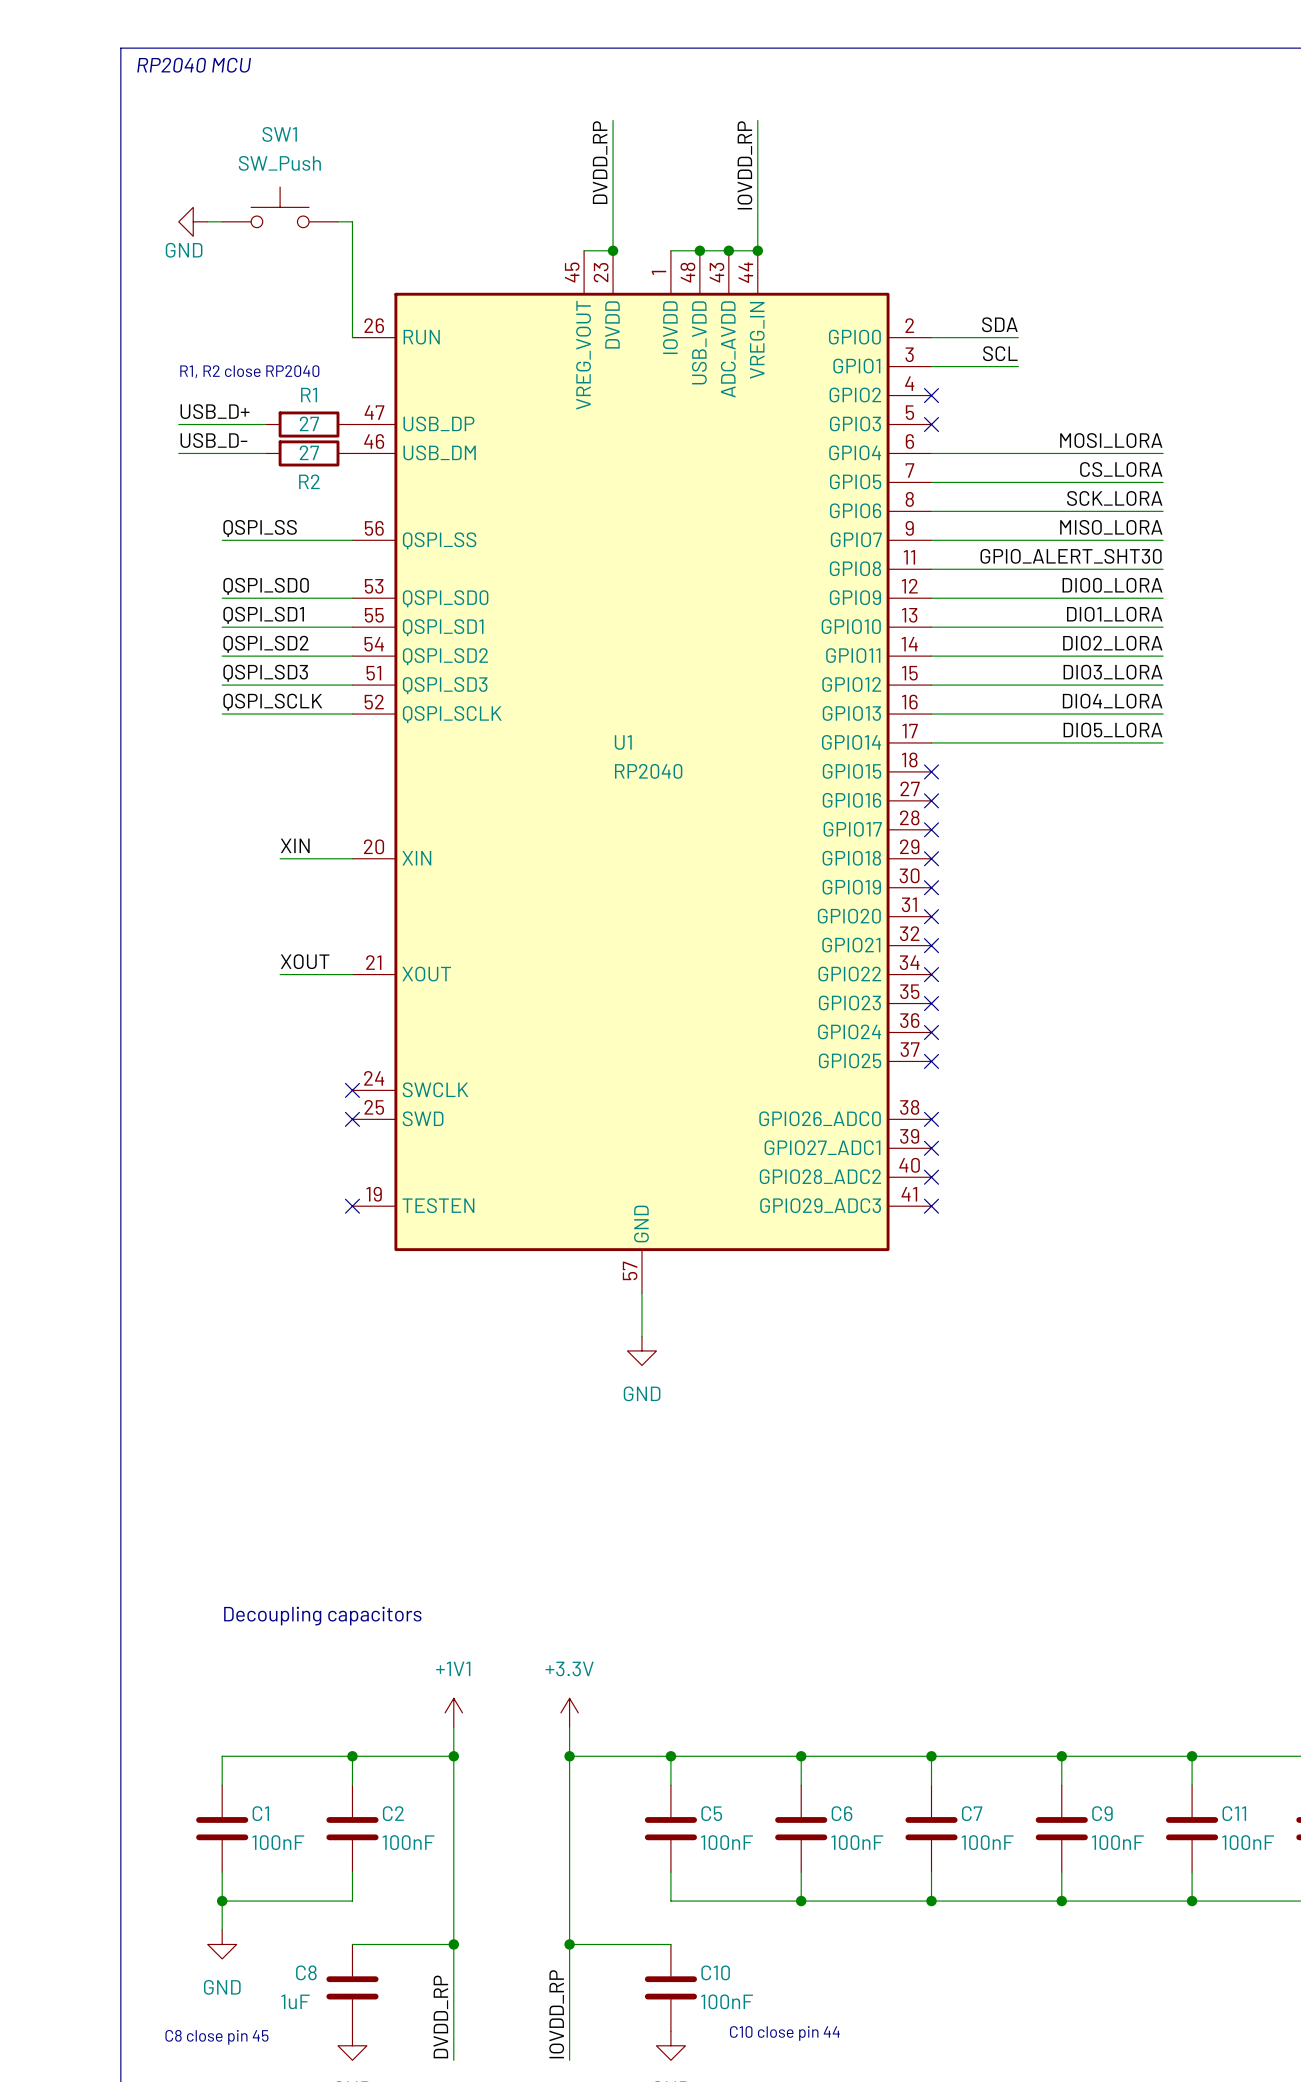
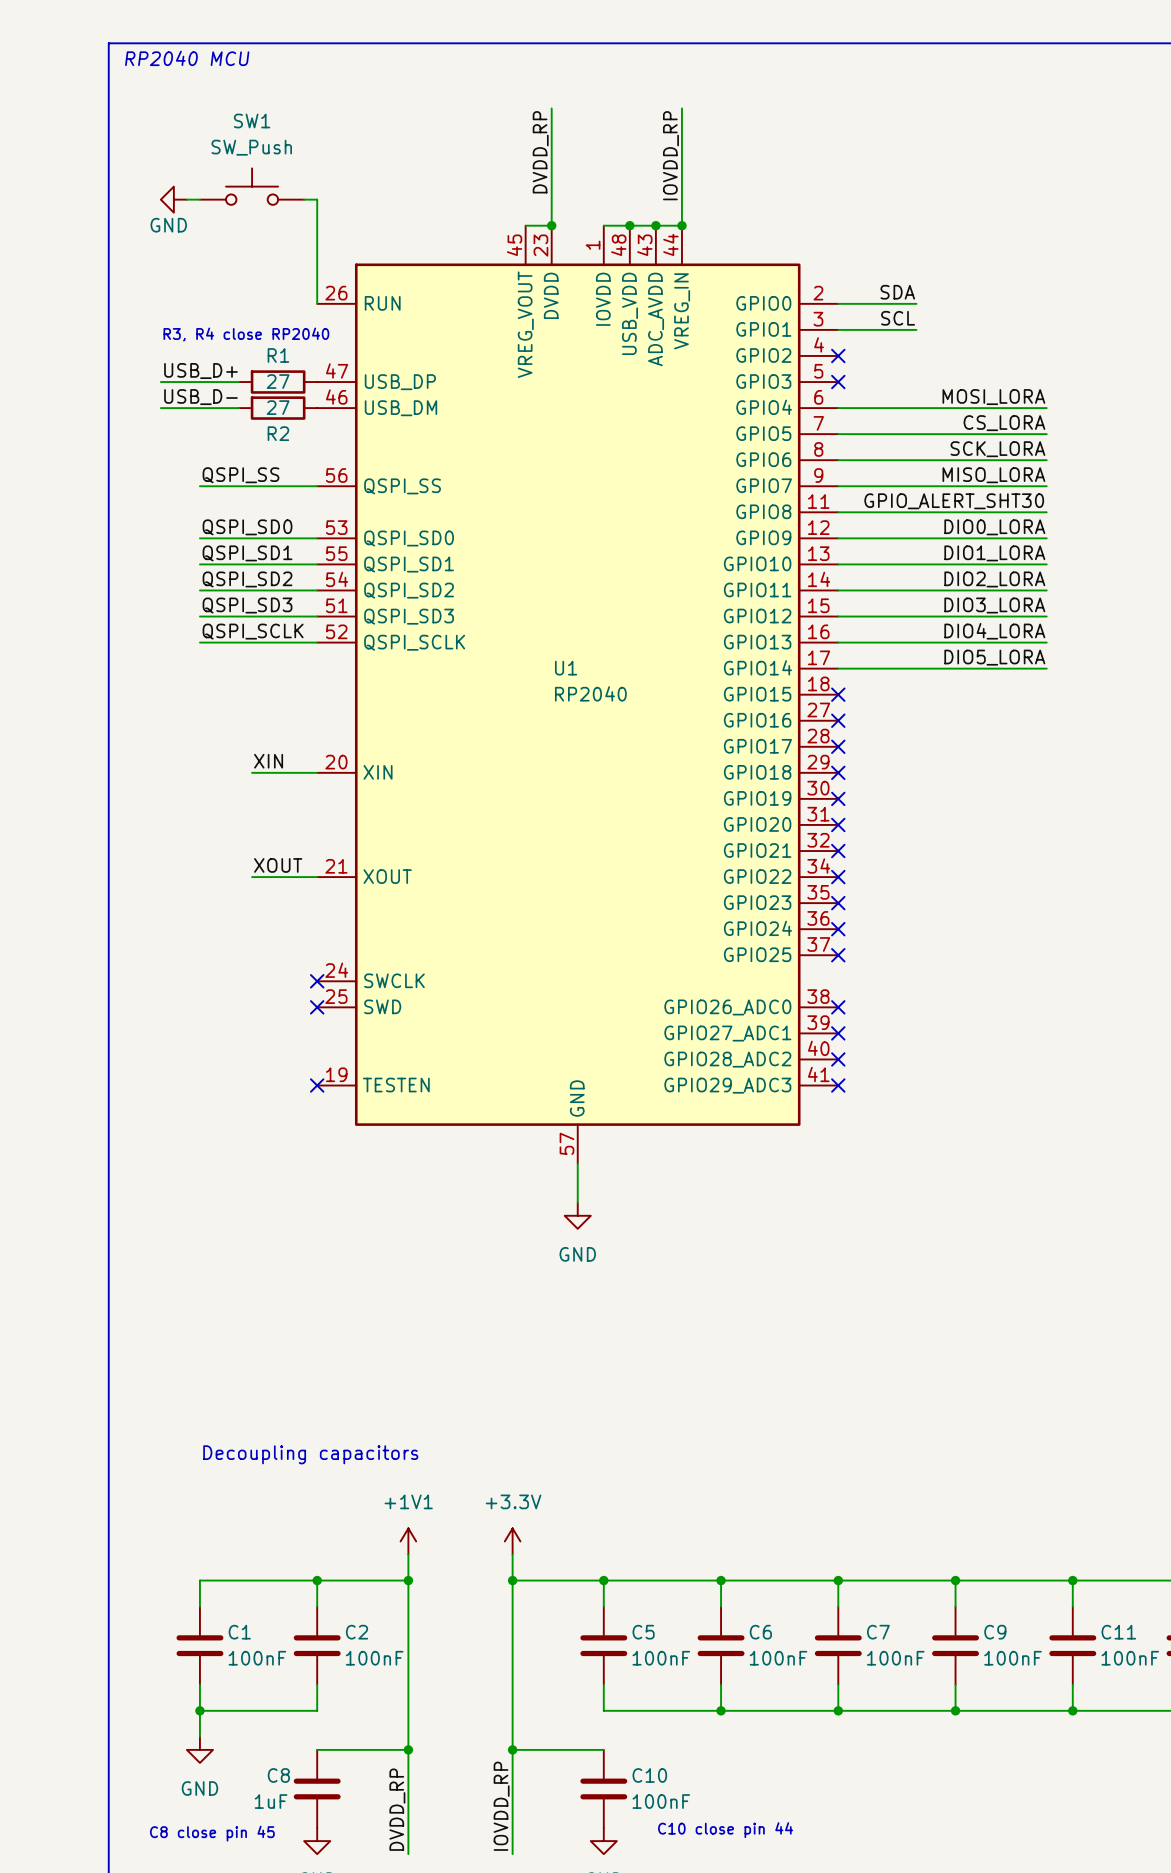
text: R1, R2 close RP2040 (249, 371) -> R3, R4 close RP2040 (246, 334)

